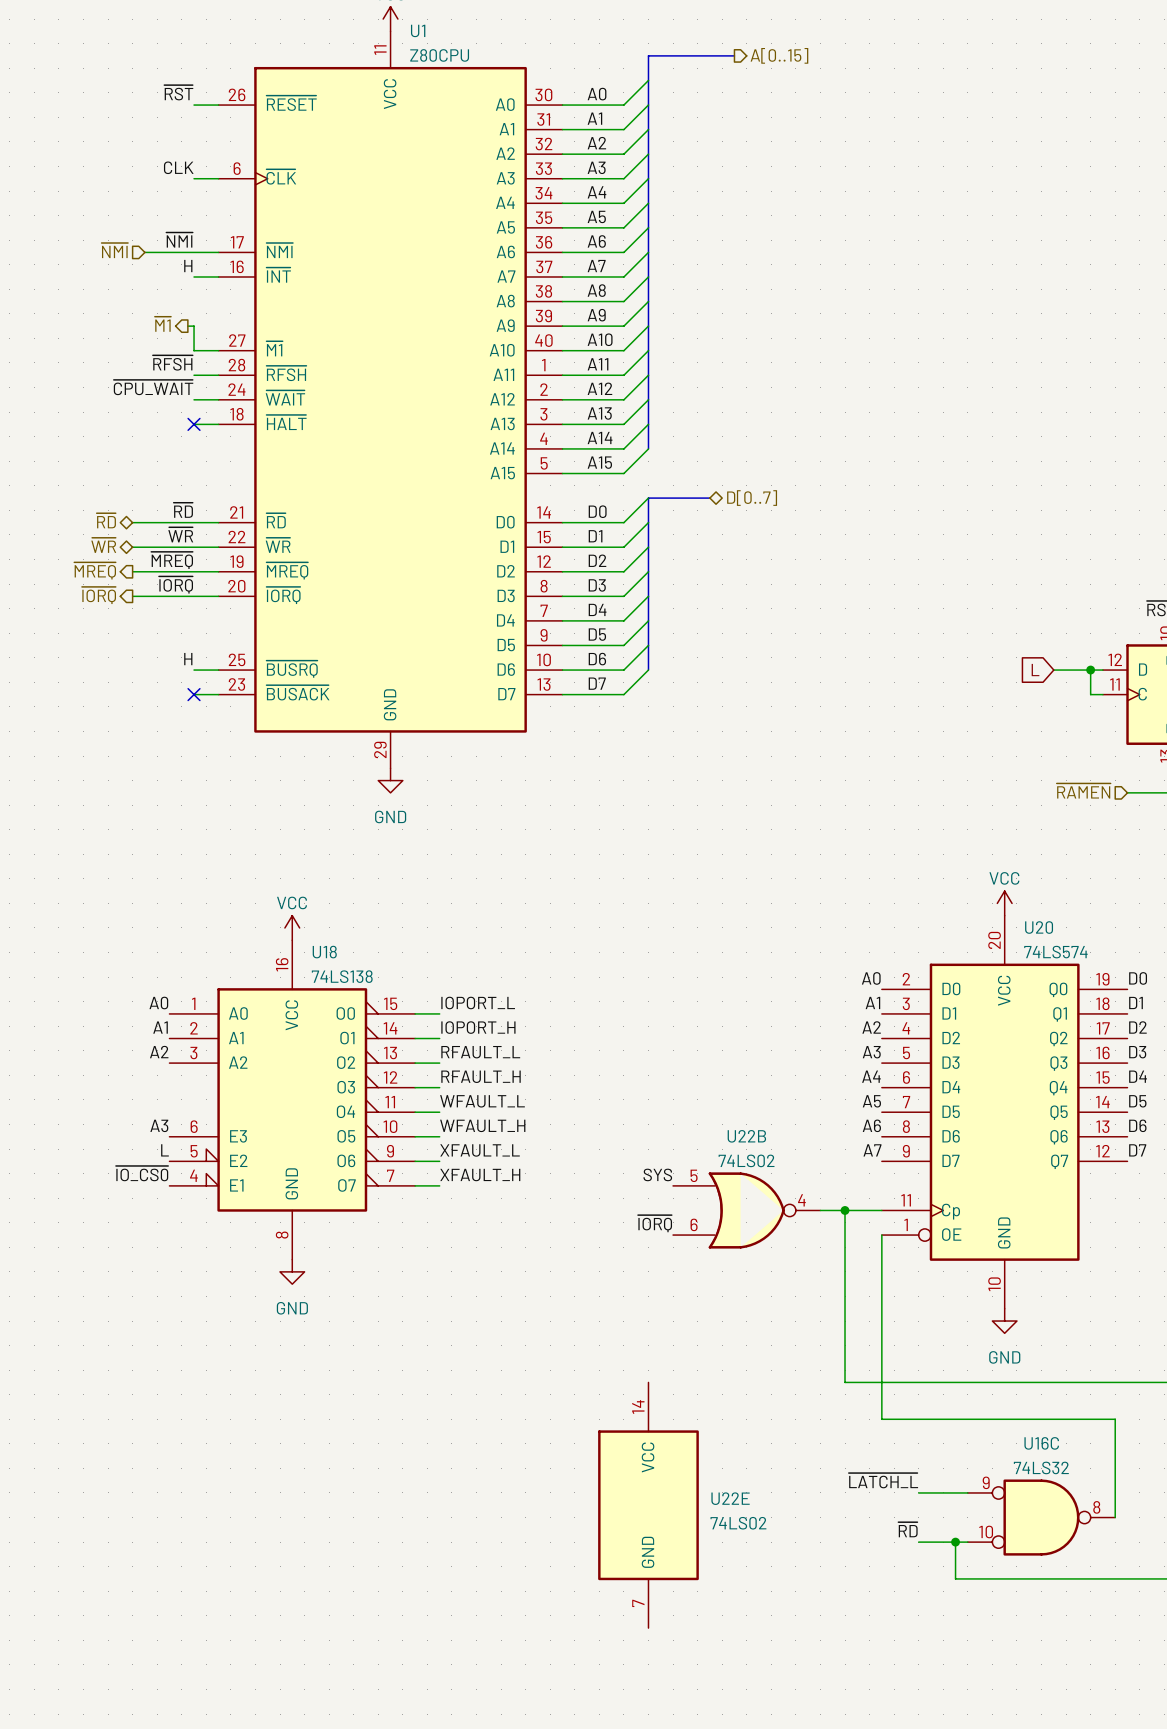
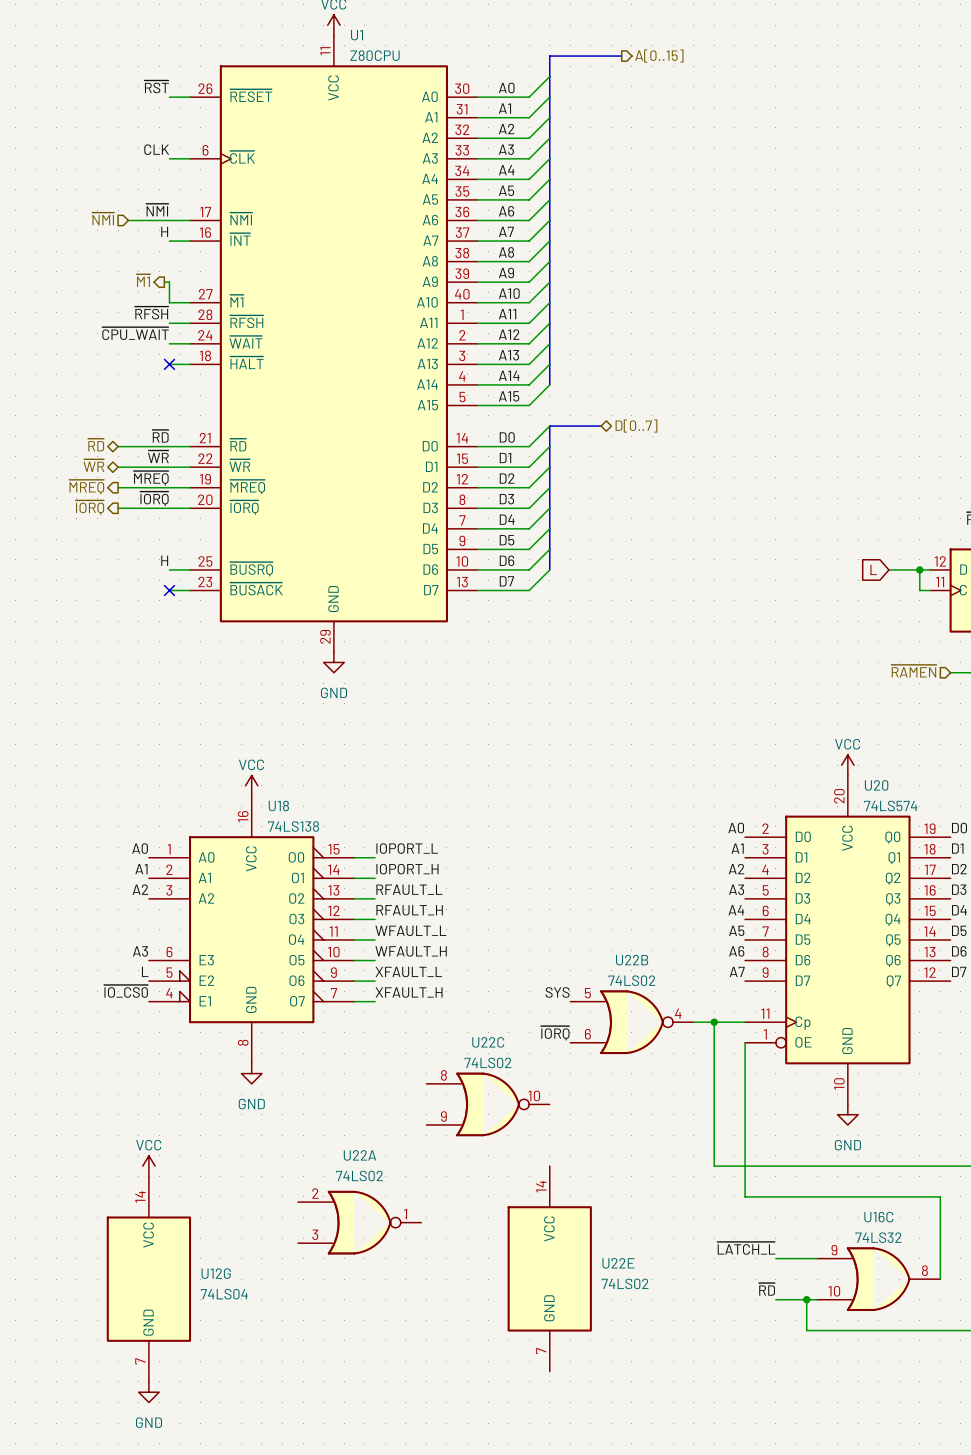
U22C: none -> 74LS02 (488, 1104)
power symbol: none -> VCC (148, 1166)
U22A: none -> 74LS02 (359, 1222)
U16C symbol: [967, 1479, 1116, 1556] -> [817, 1247, 941, 1312]
U12G: none -> 74LS04 (148, 1279)
power symbol: none -> GND (148, 1392)

